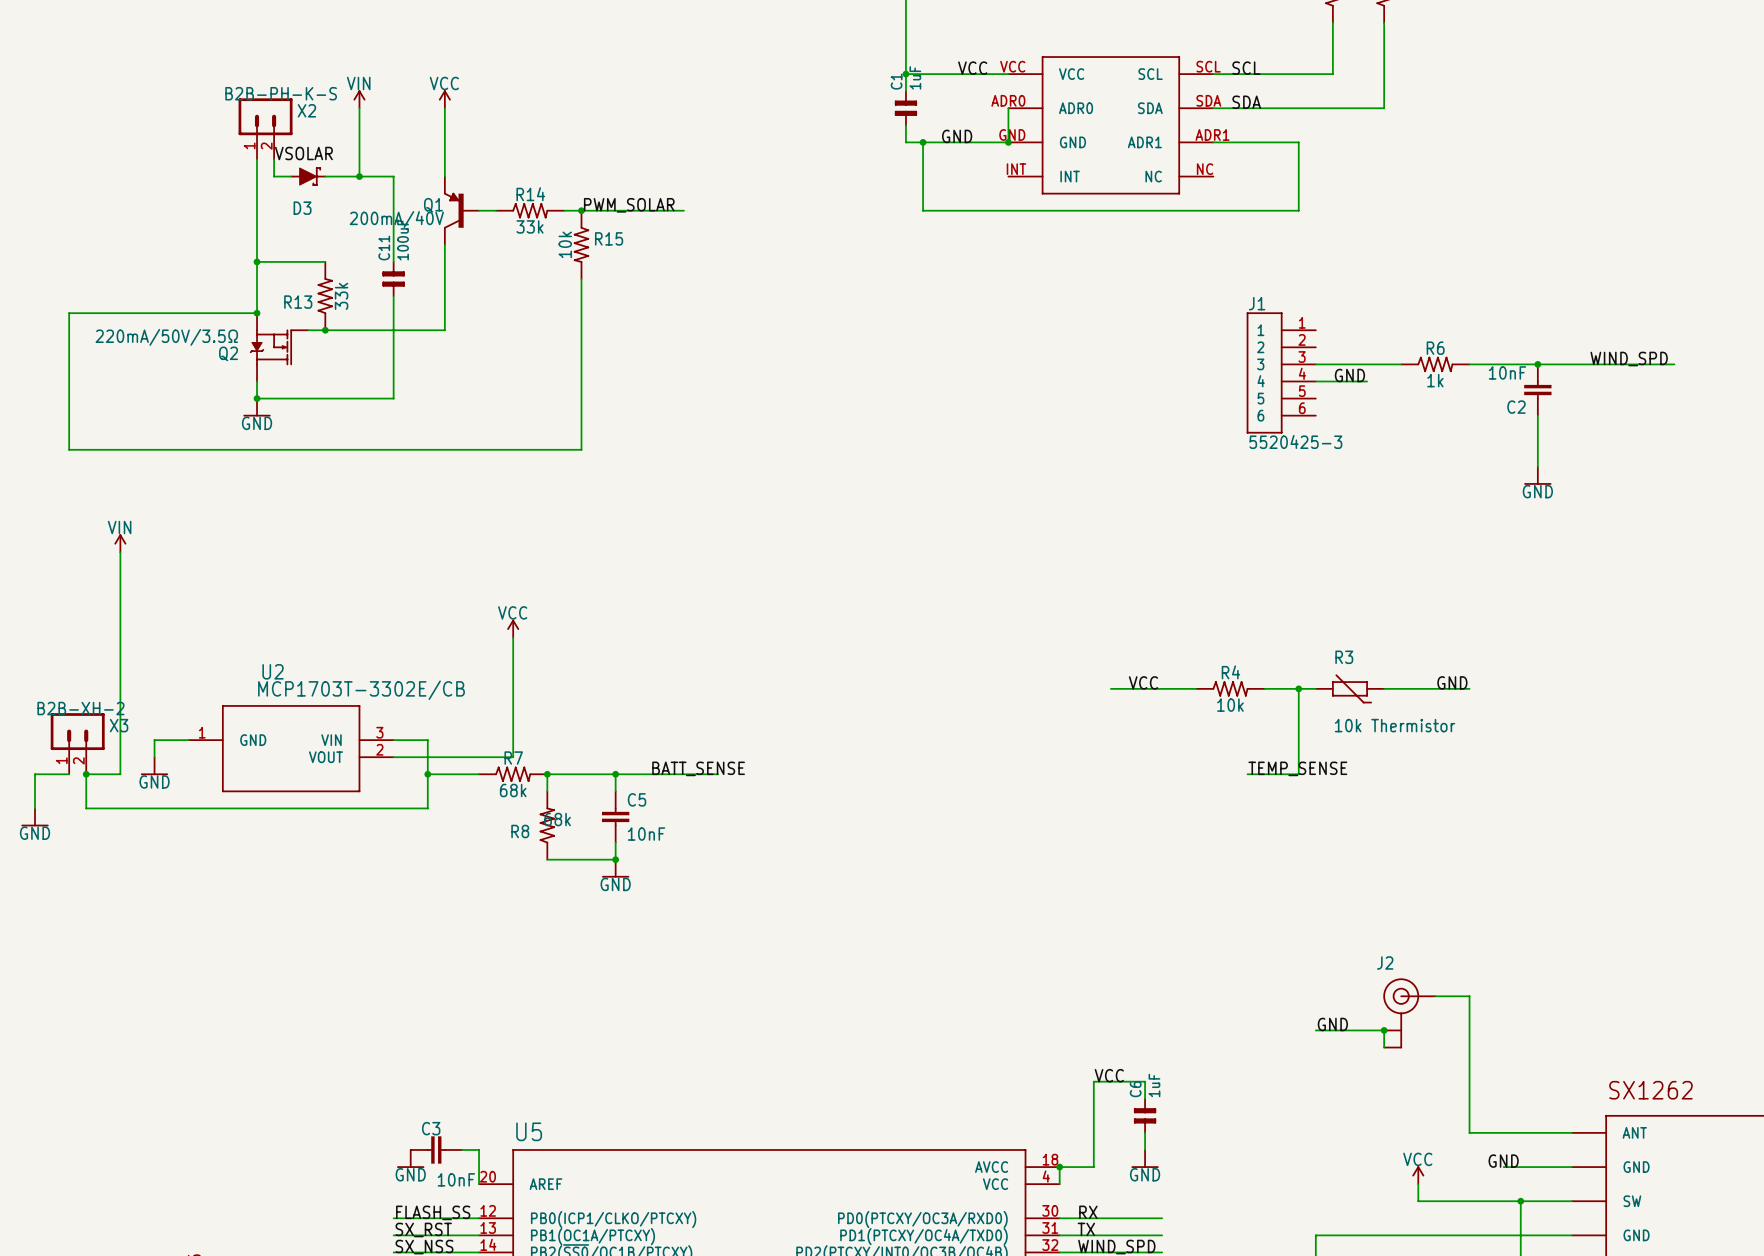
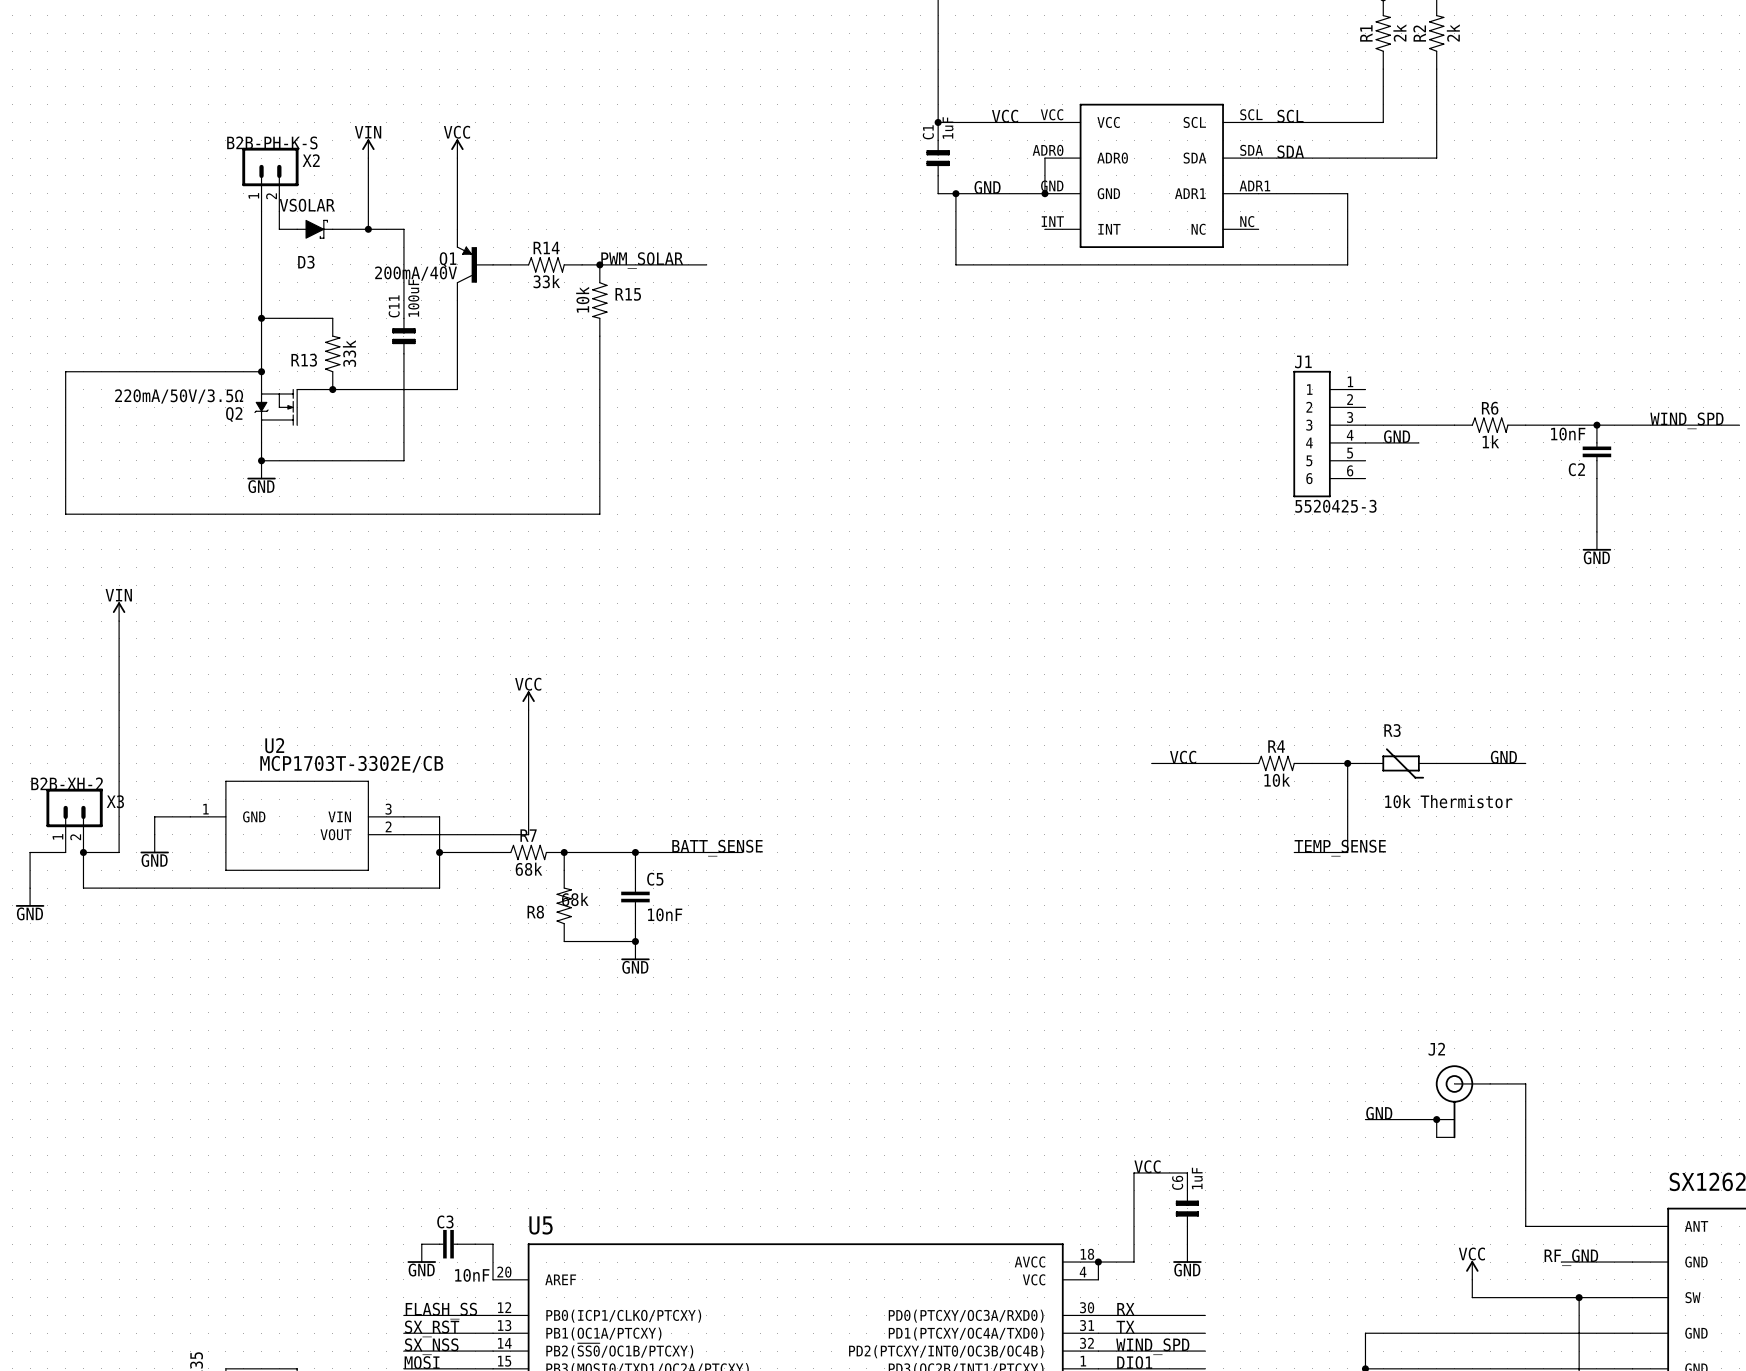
label: GND (1503, 1161) -> RF_GND (1571, 1257)

